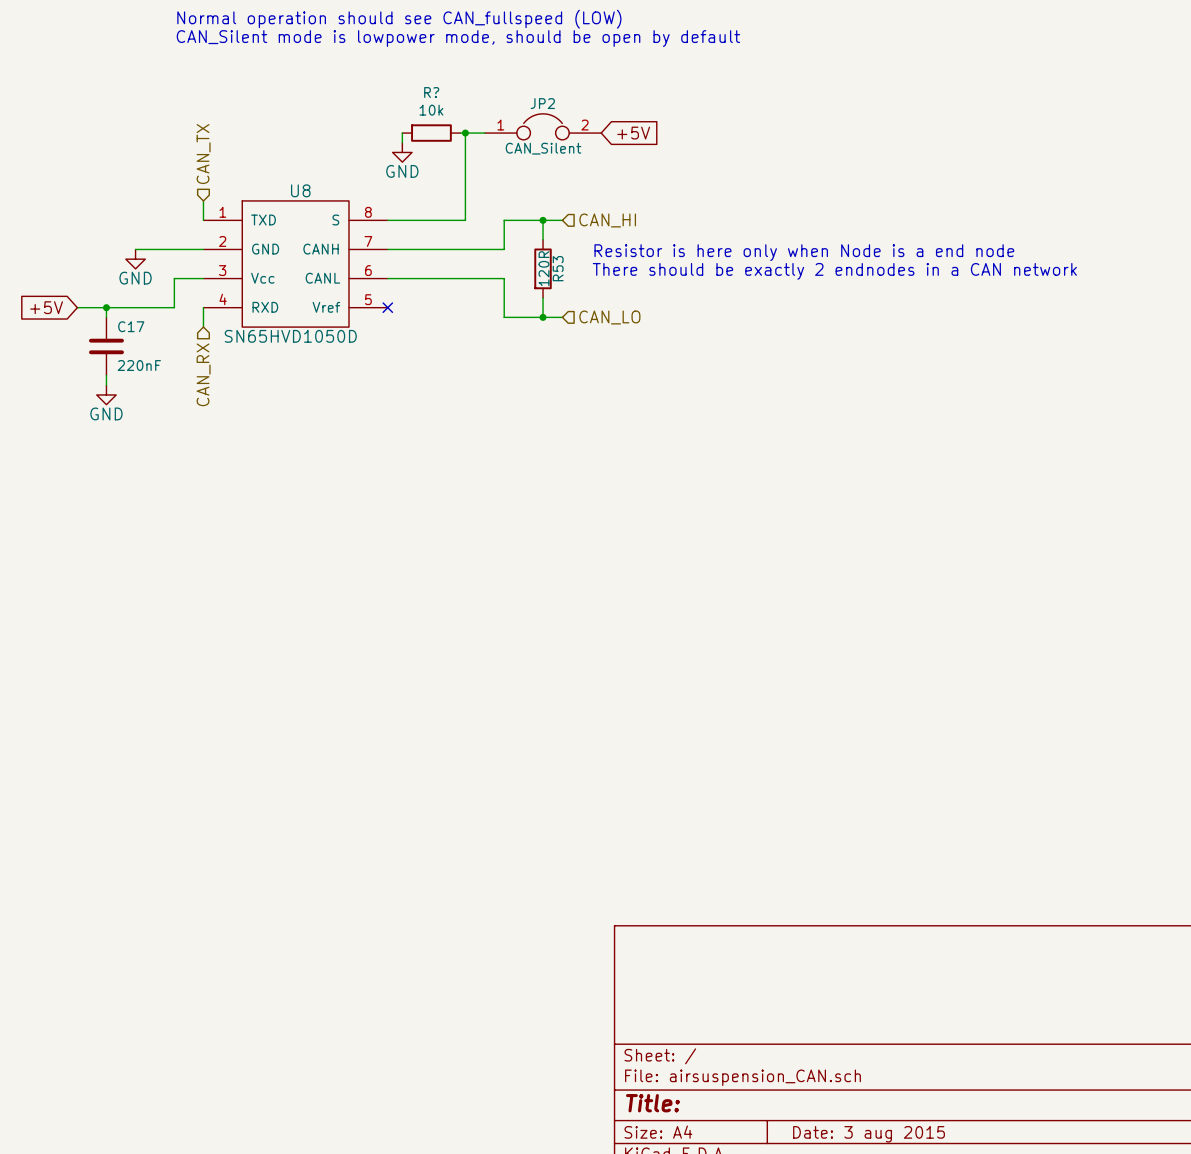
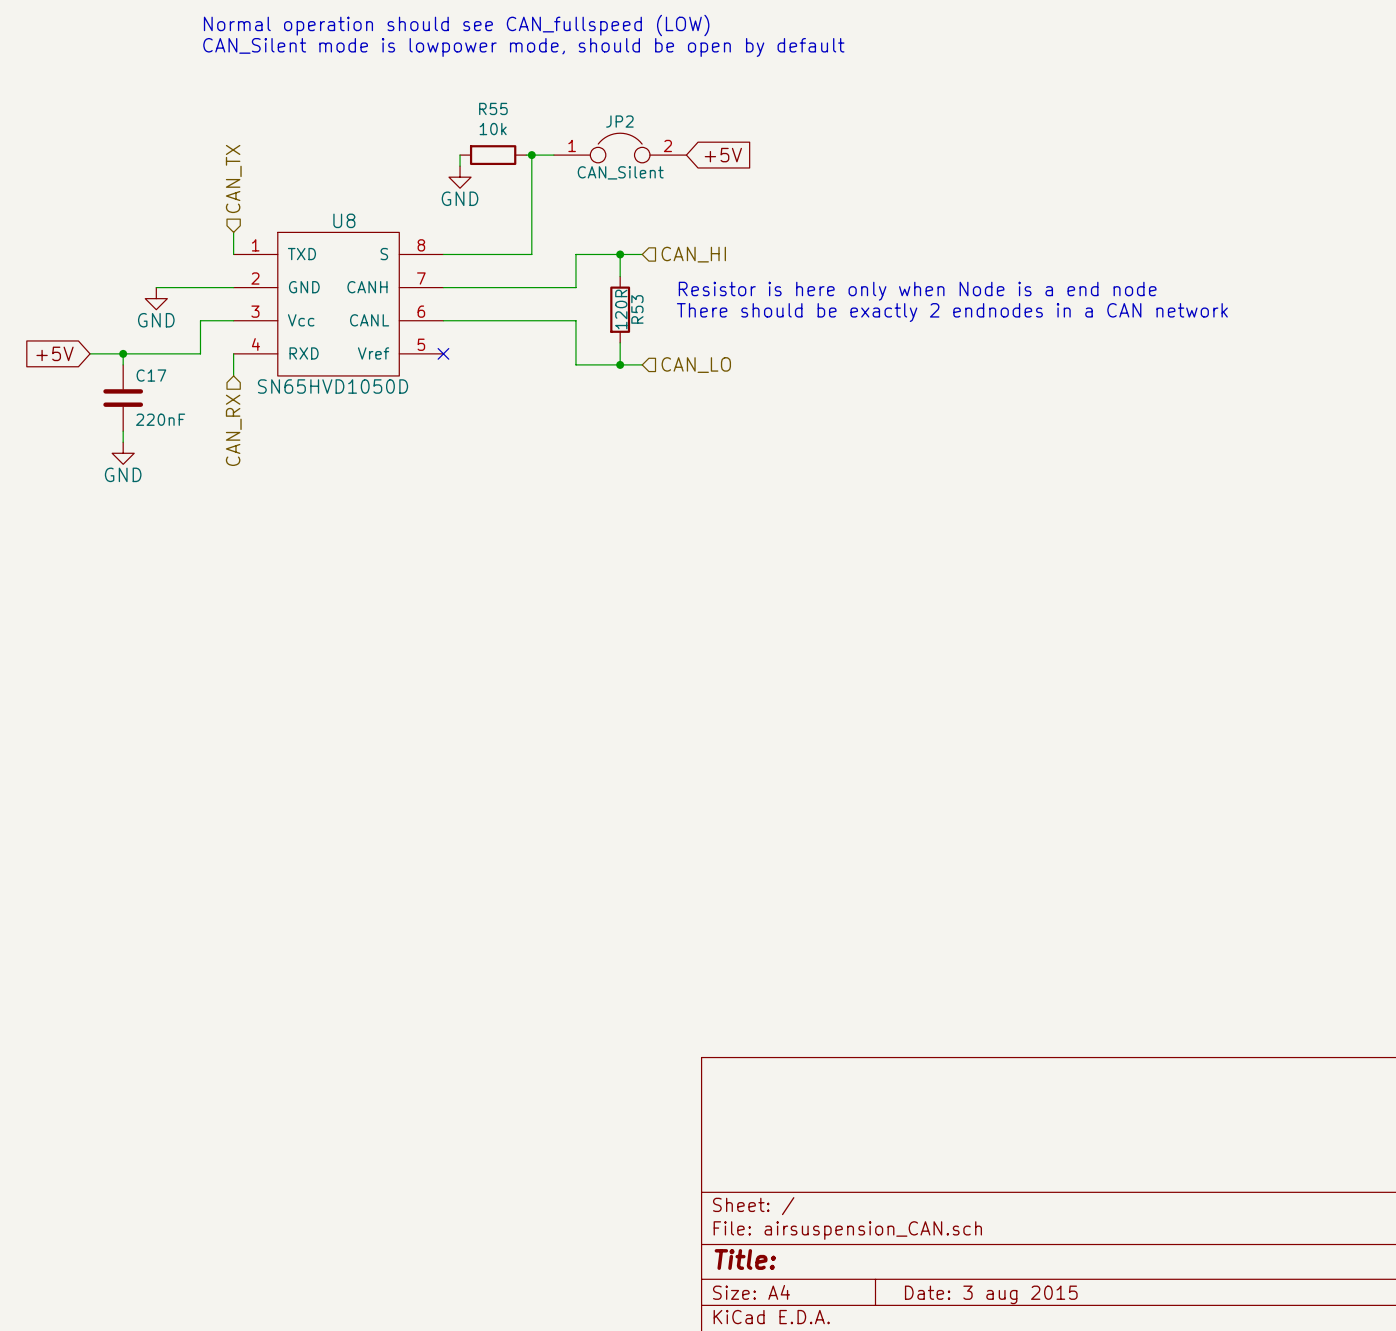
R? name: R? (431, 92) -> R55 (493, 108)

